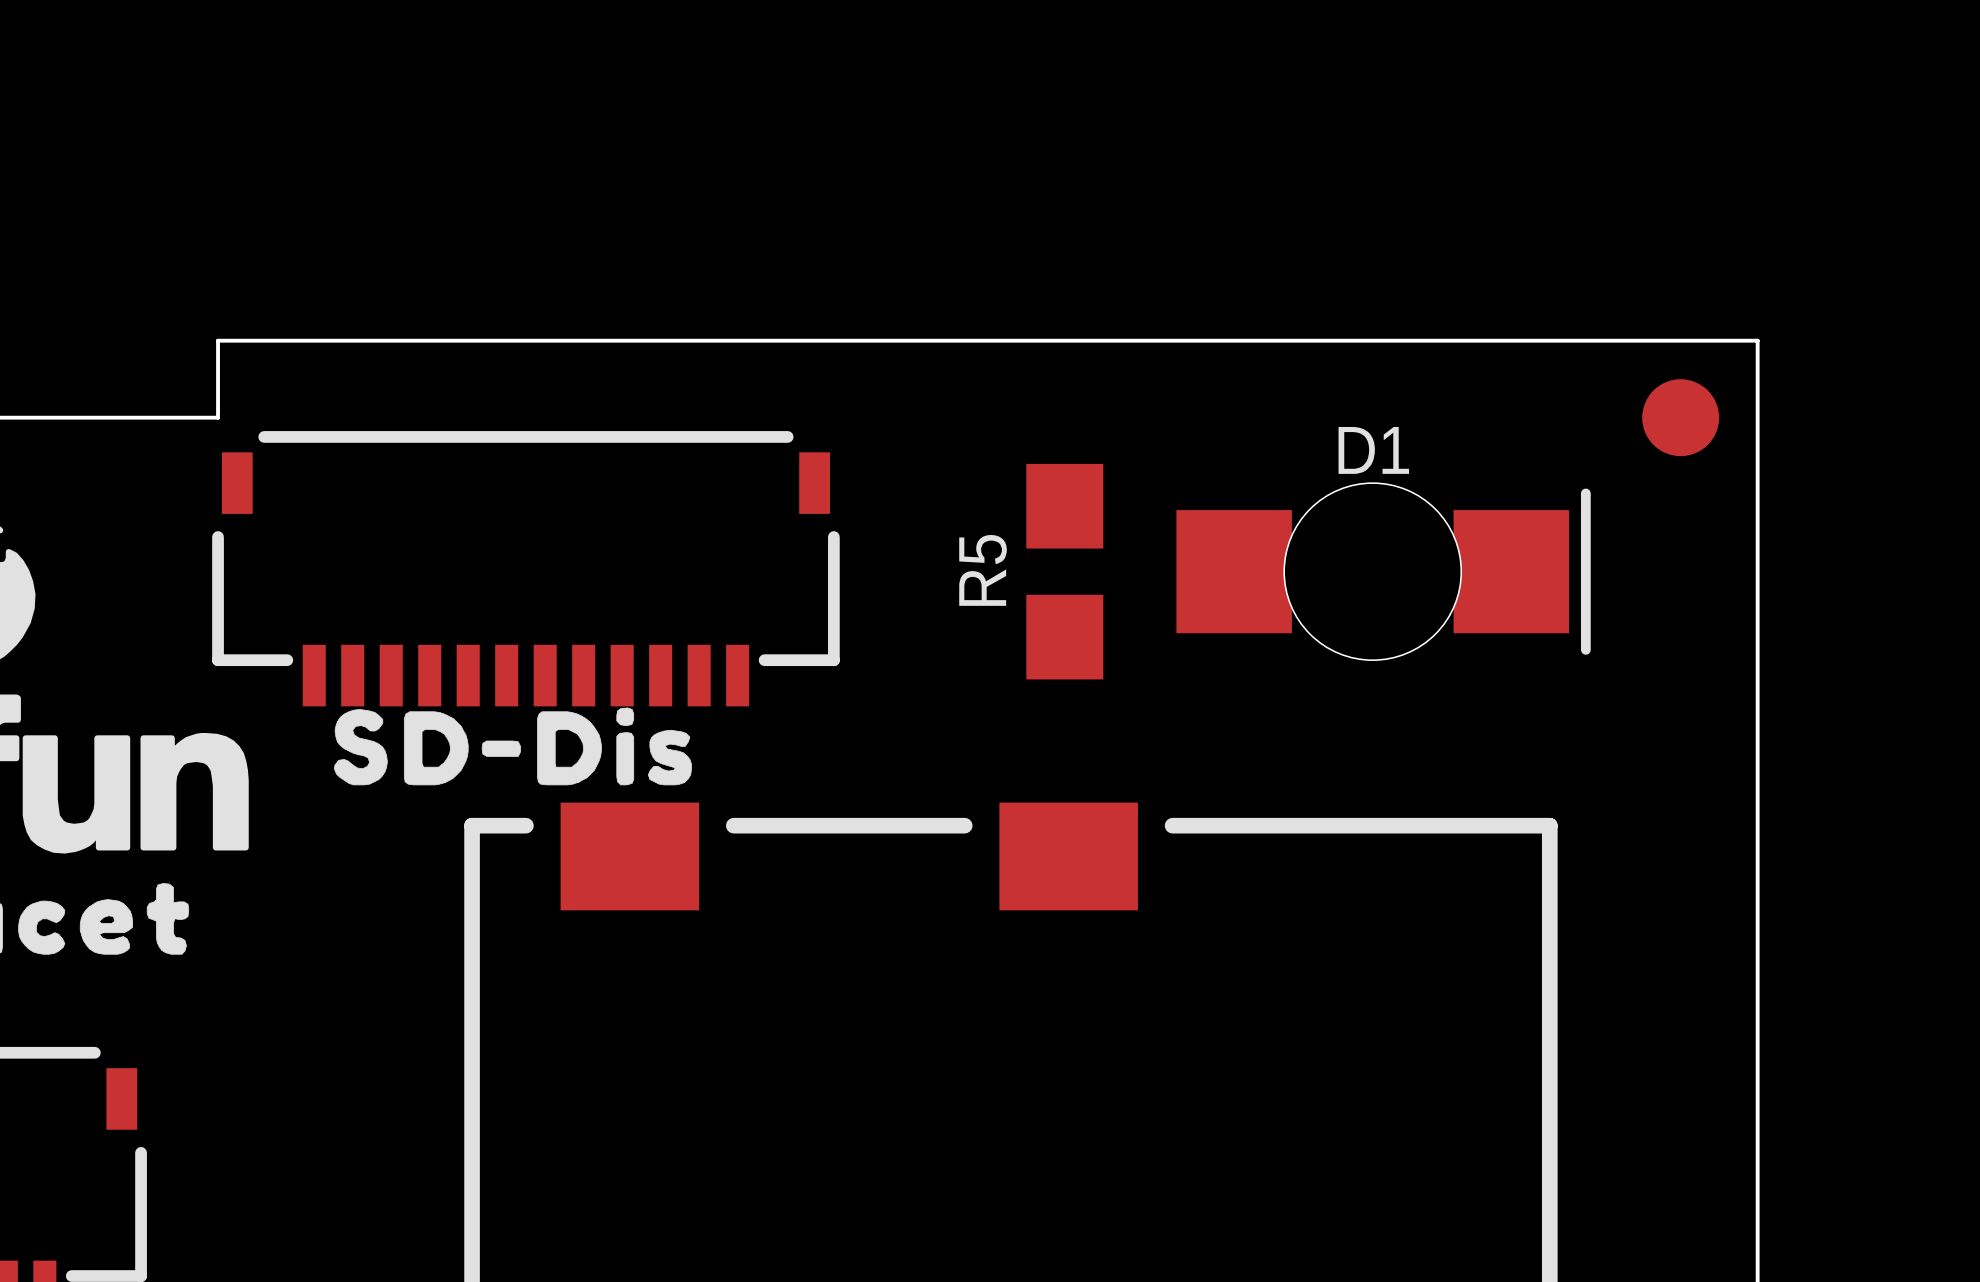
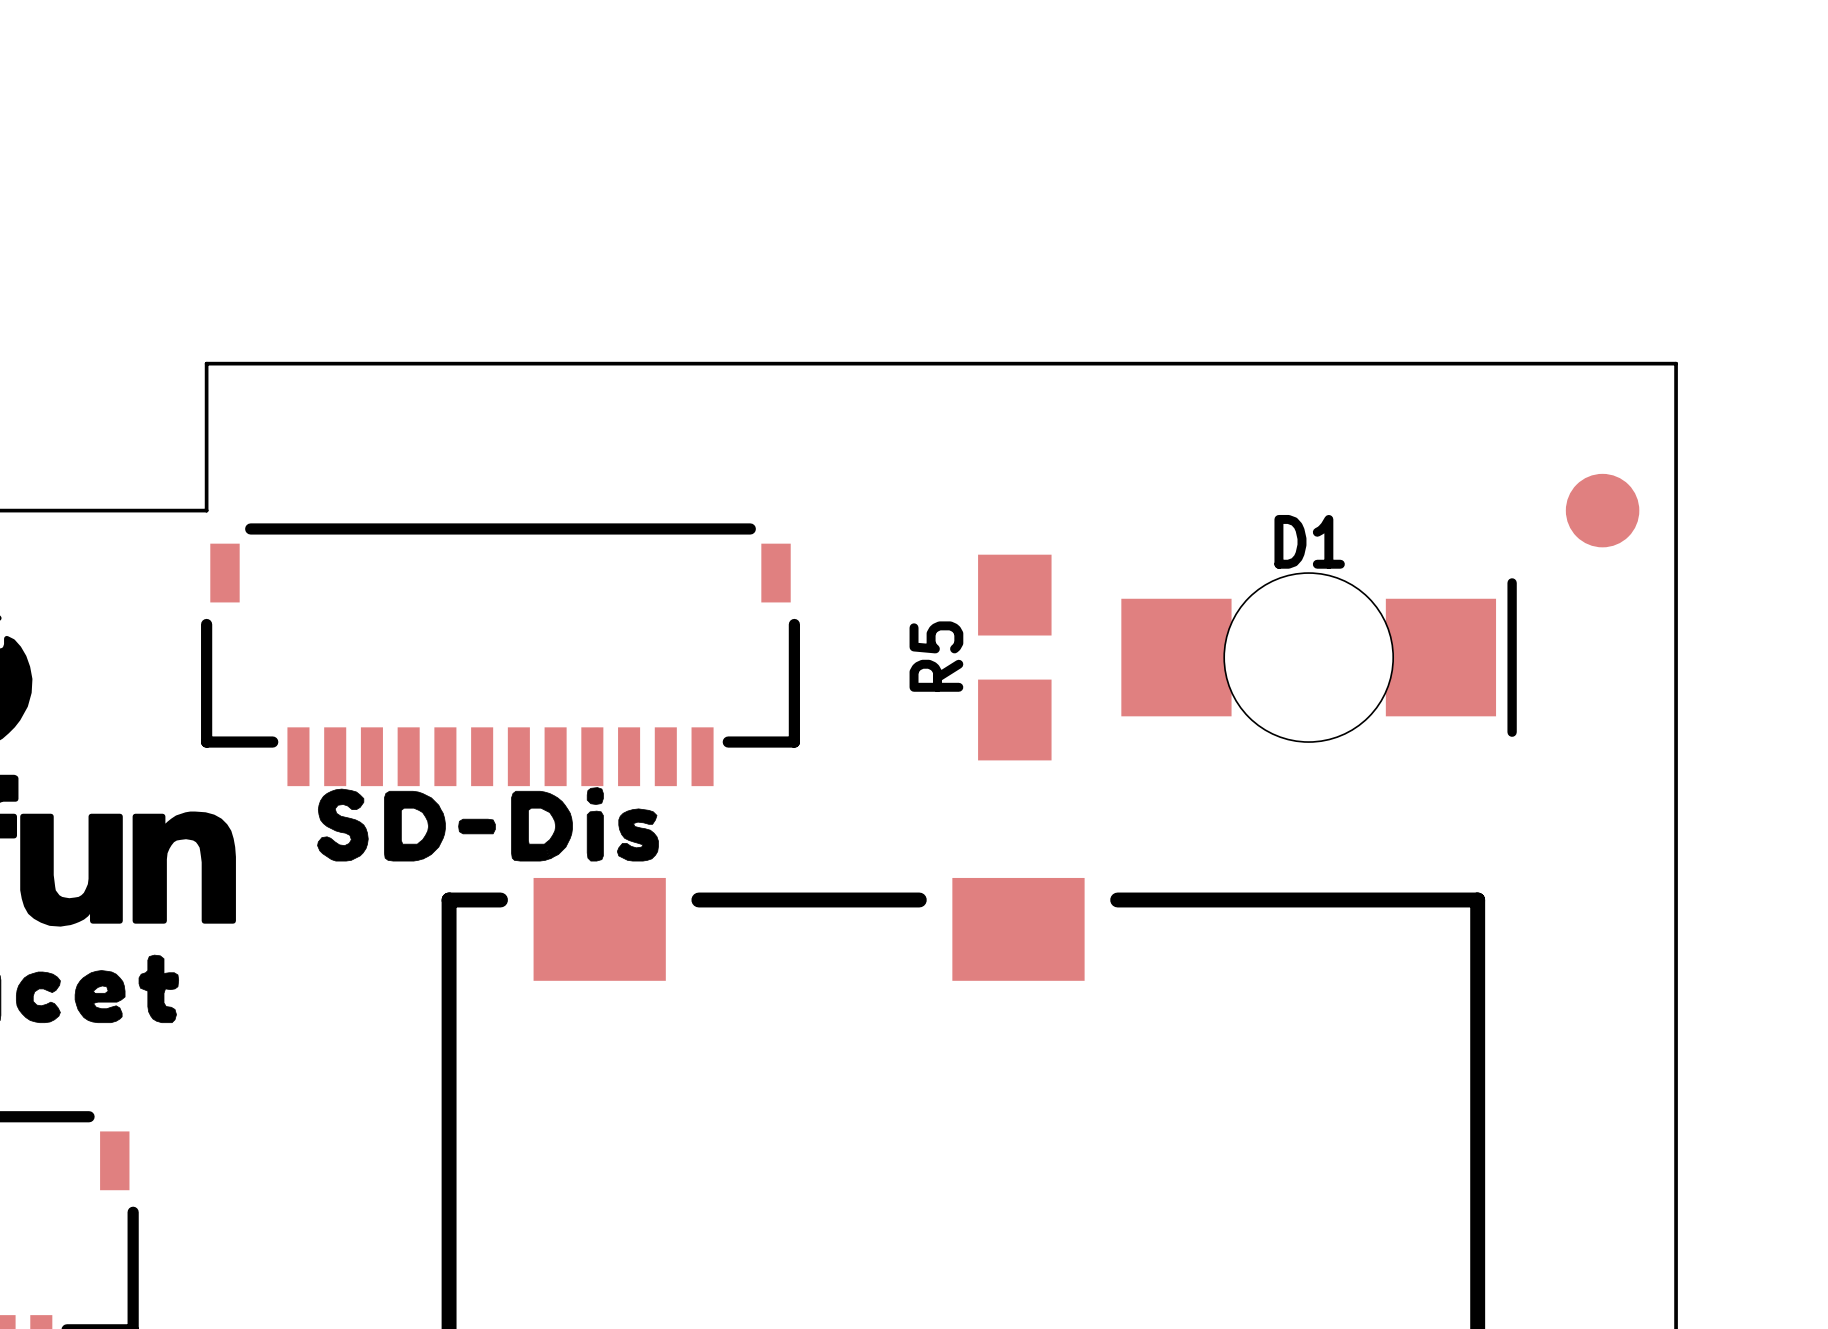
board edge: (218, 340) (1757, 340) -> (206, 437) (206, 363) (1676, 363) (1676, 437)

